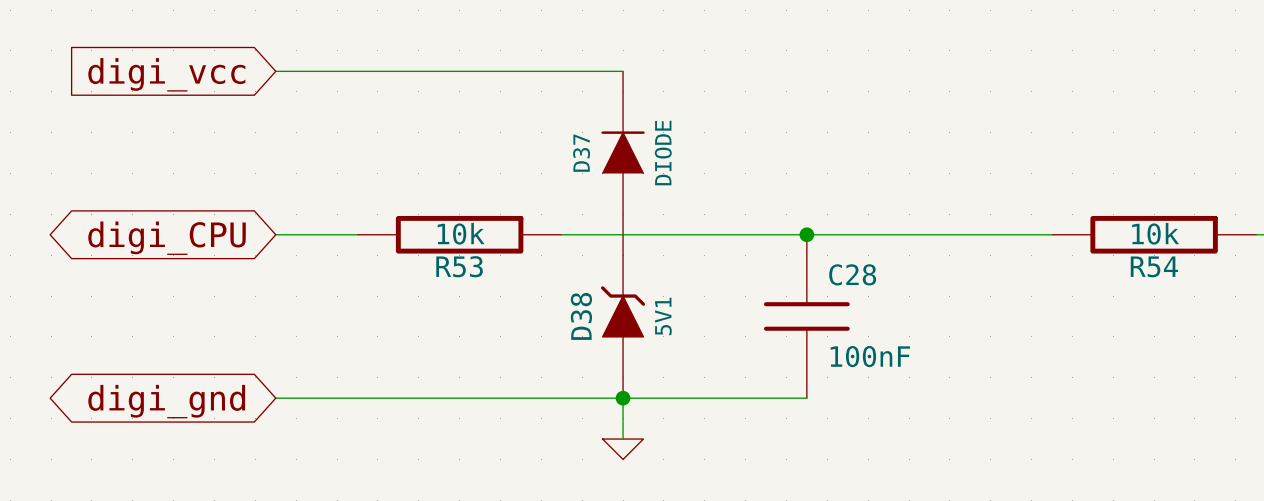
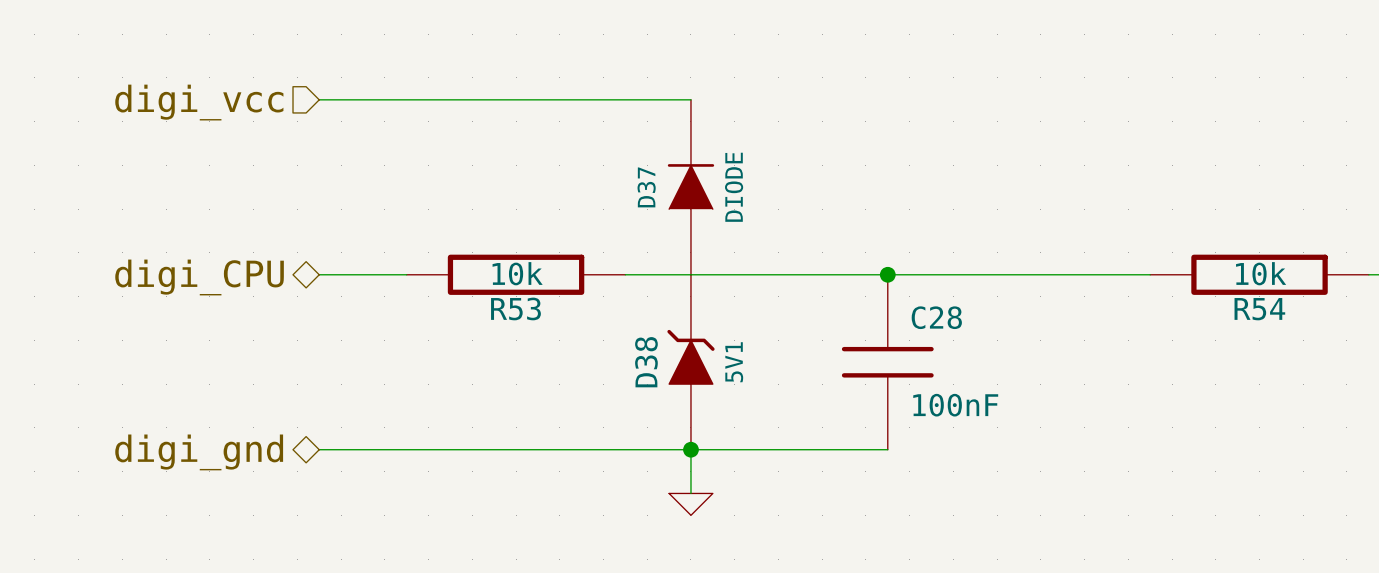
hierarchical label: none -> digi_vcc (199, 102)
global label: digi_vcc (166, 74) -> none
hierarchical label: none -> digi_CPU (199, 277)
global label: digi_CPU (167, 238) -> none
hierarchical label: none -> digi_gnd (199, 452)
global label: digi_gnd (166, 401) -> none

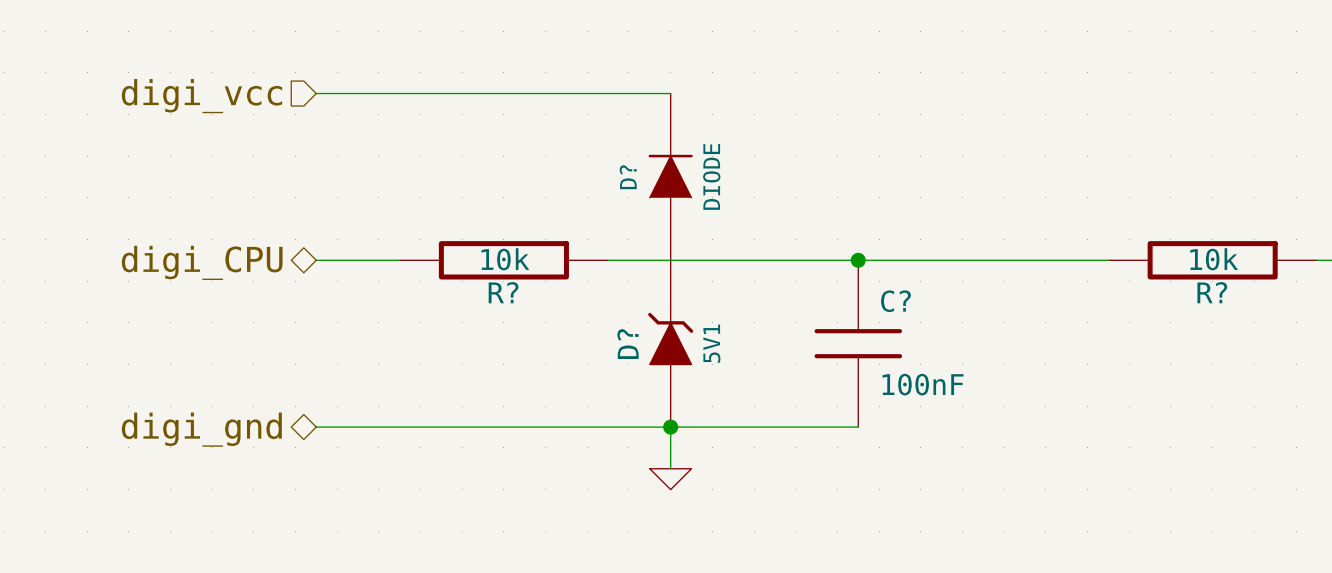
D37 name: D37 (646, 187) -> D? (628, 177)
R53 name: R53 (515, 308) -> R? (503, 292)
R54 name: R54 (1259, 309) -> R? (1212, 292)
C28 name: C28 (936, 317) -> C? (895, 301)
D38 name: D38 (646, 362) -> D? (628, 344)

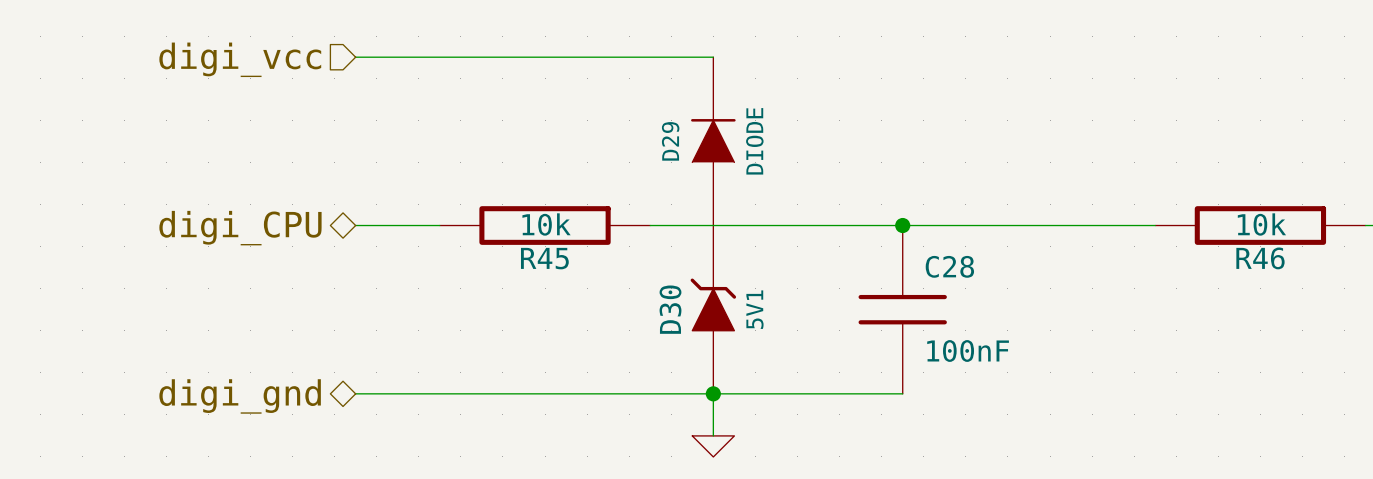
D? name: D? (628, 177) -> D29 (670, 141)
R? name: R? (503, 292) -> R45 (544, 258)
R? name: R? (1212, 292) -> R46 (1260, 258)
C? name: C? (895, 301) -> C28 (949, 266)
D? name: D? (628, 344) -> D30 (670, 309)

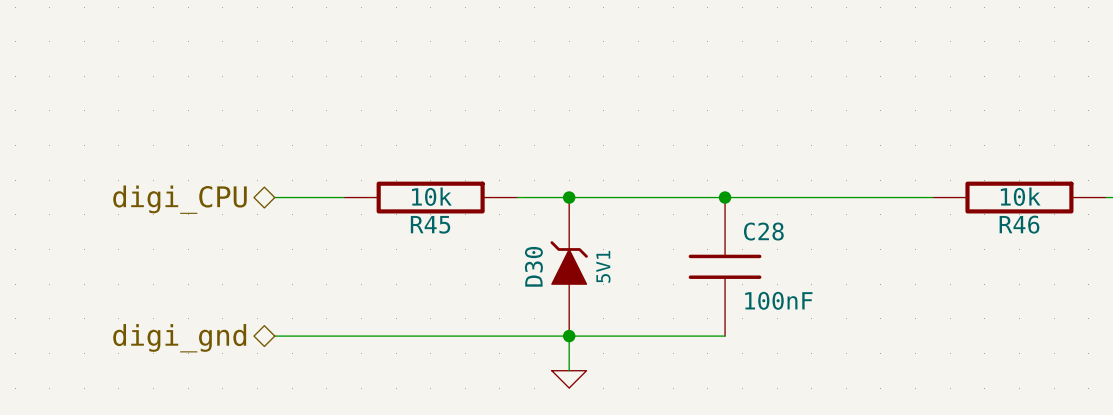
wire: (355, 57) (713, 57) -> none
hierarchical label: digi_vcc (240, 59) -> none
D29: DIODE (713, 141) -> none
junction: none -> (569, 197)

